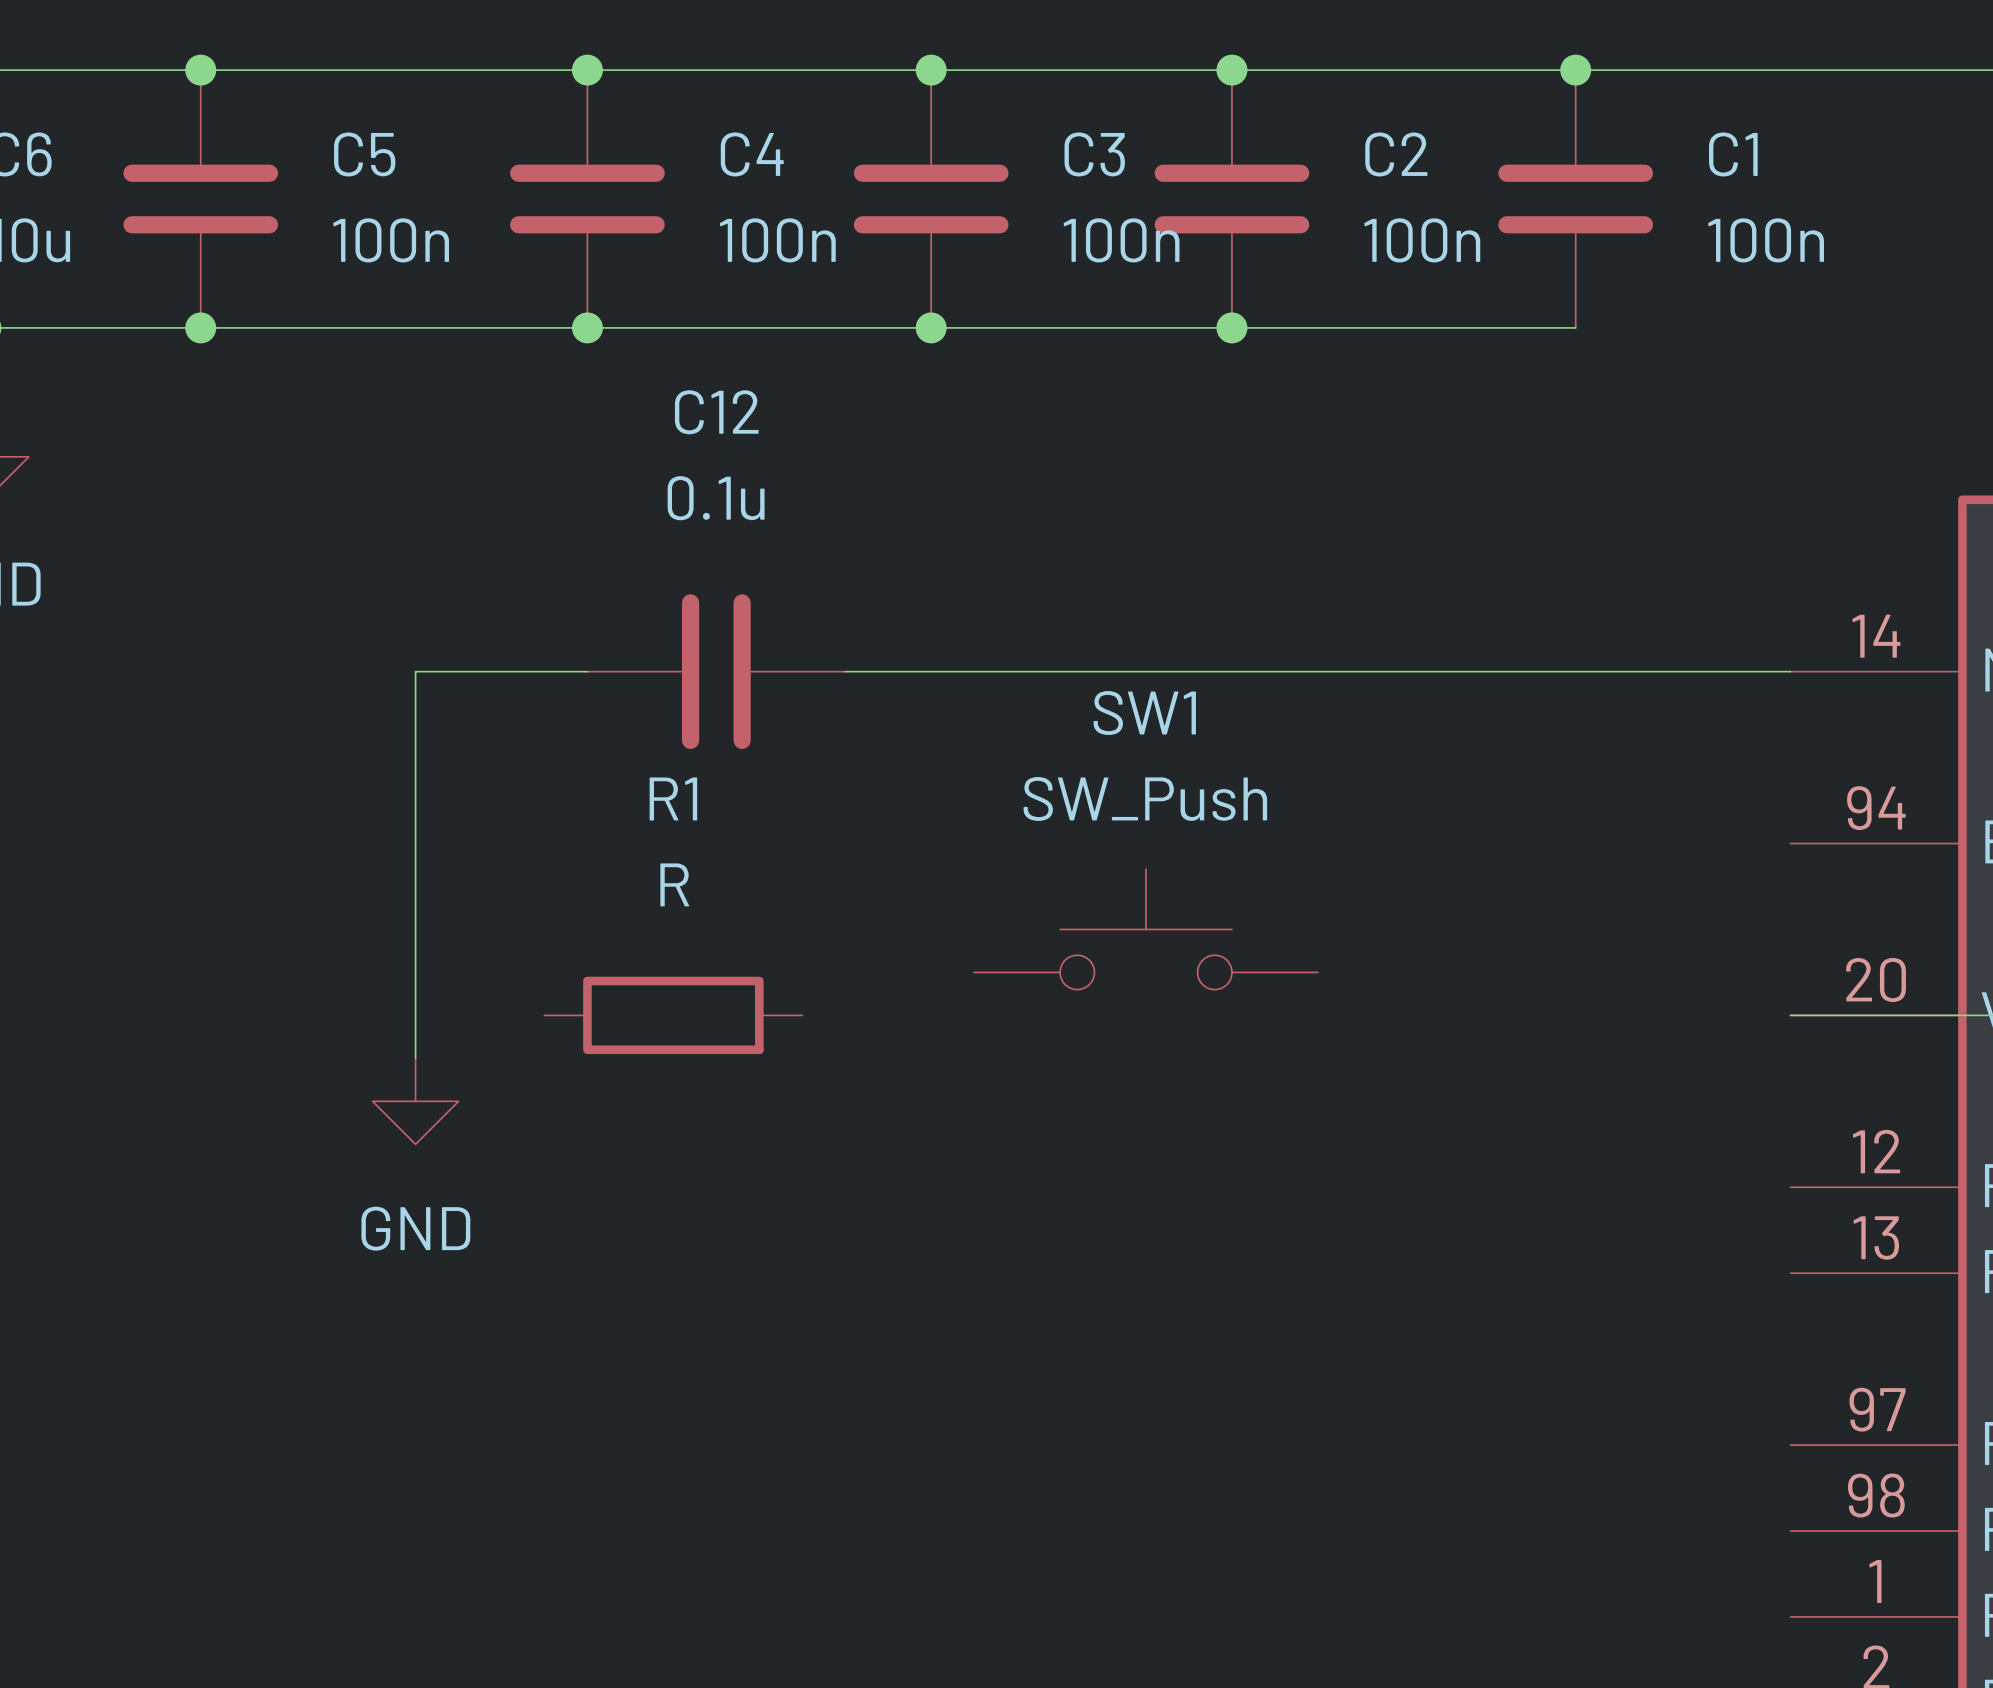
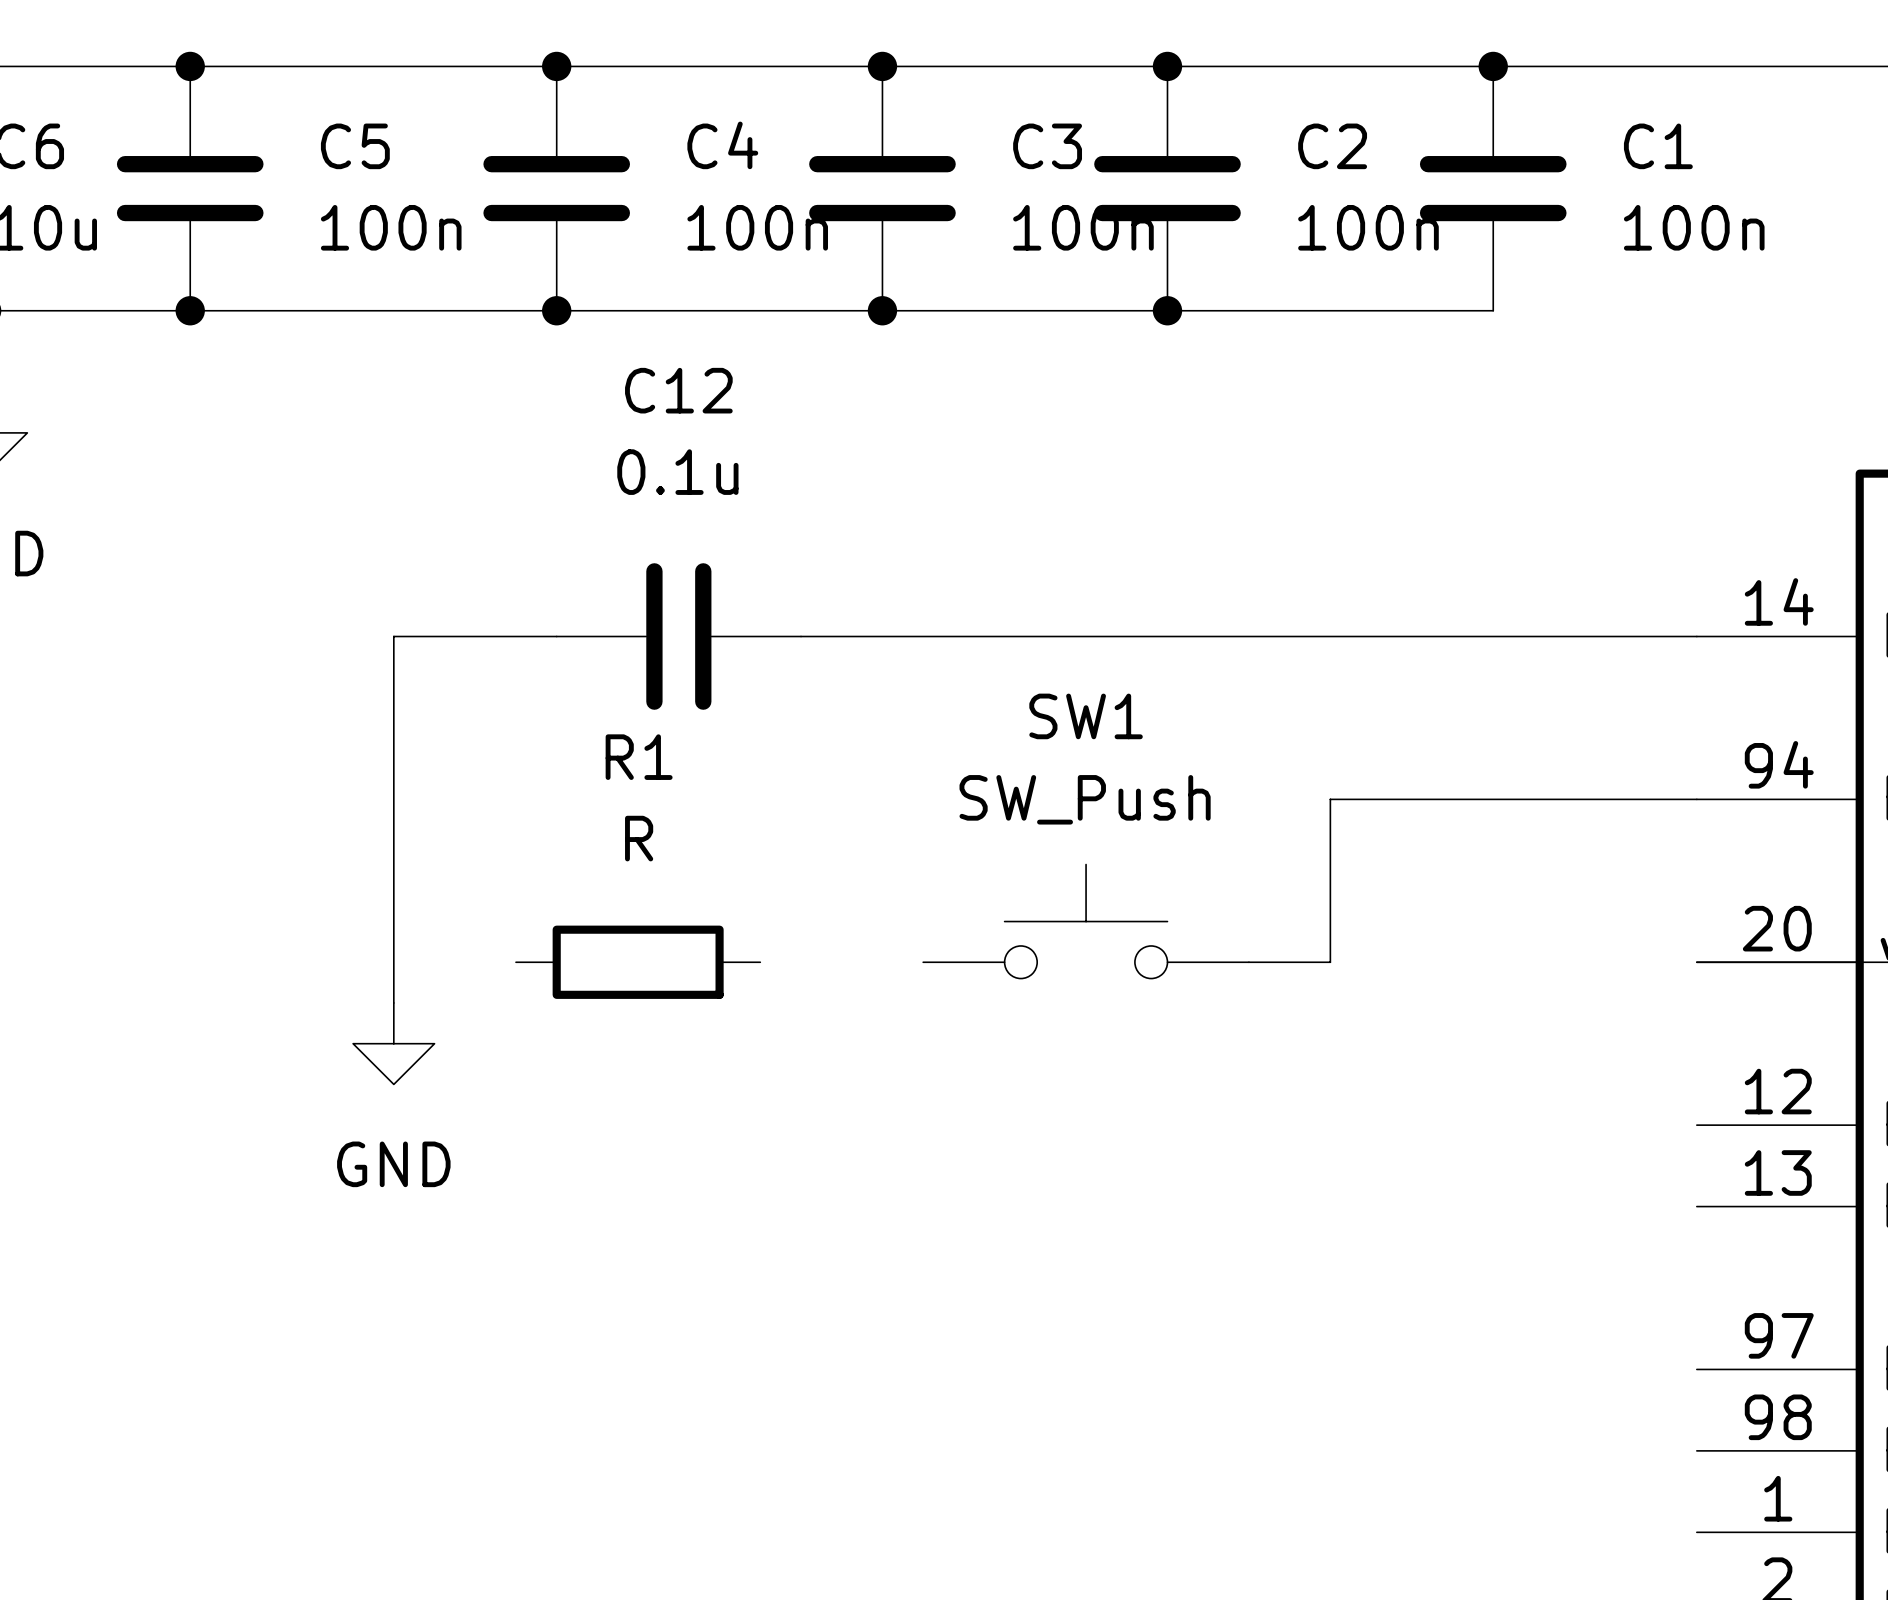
wire: none -> (1696, 799) (1330, 799) (1330, 962) (1248, 962)
SW1 position: (1146, 929) -> (1086, 921)

